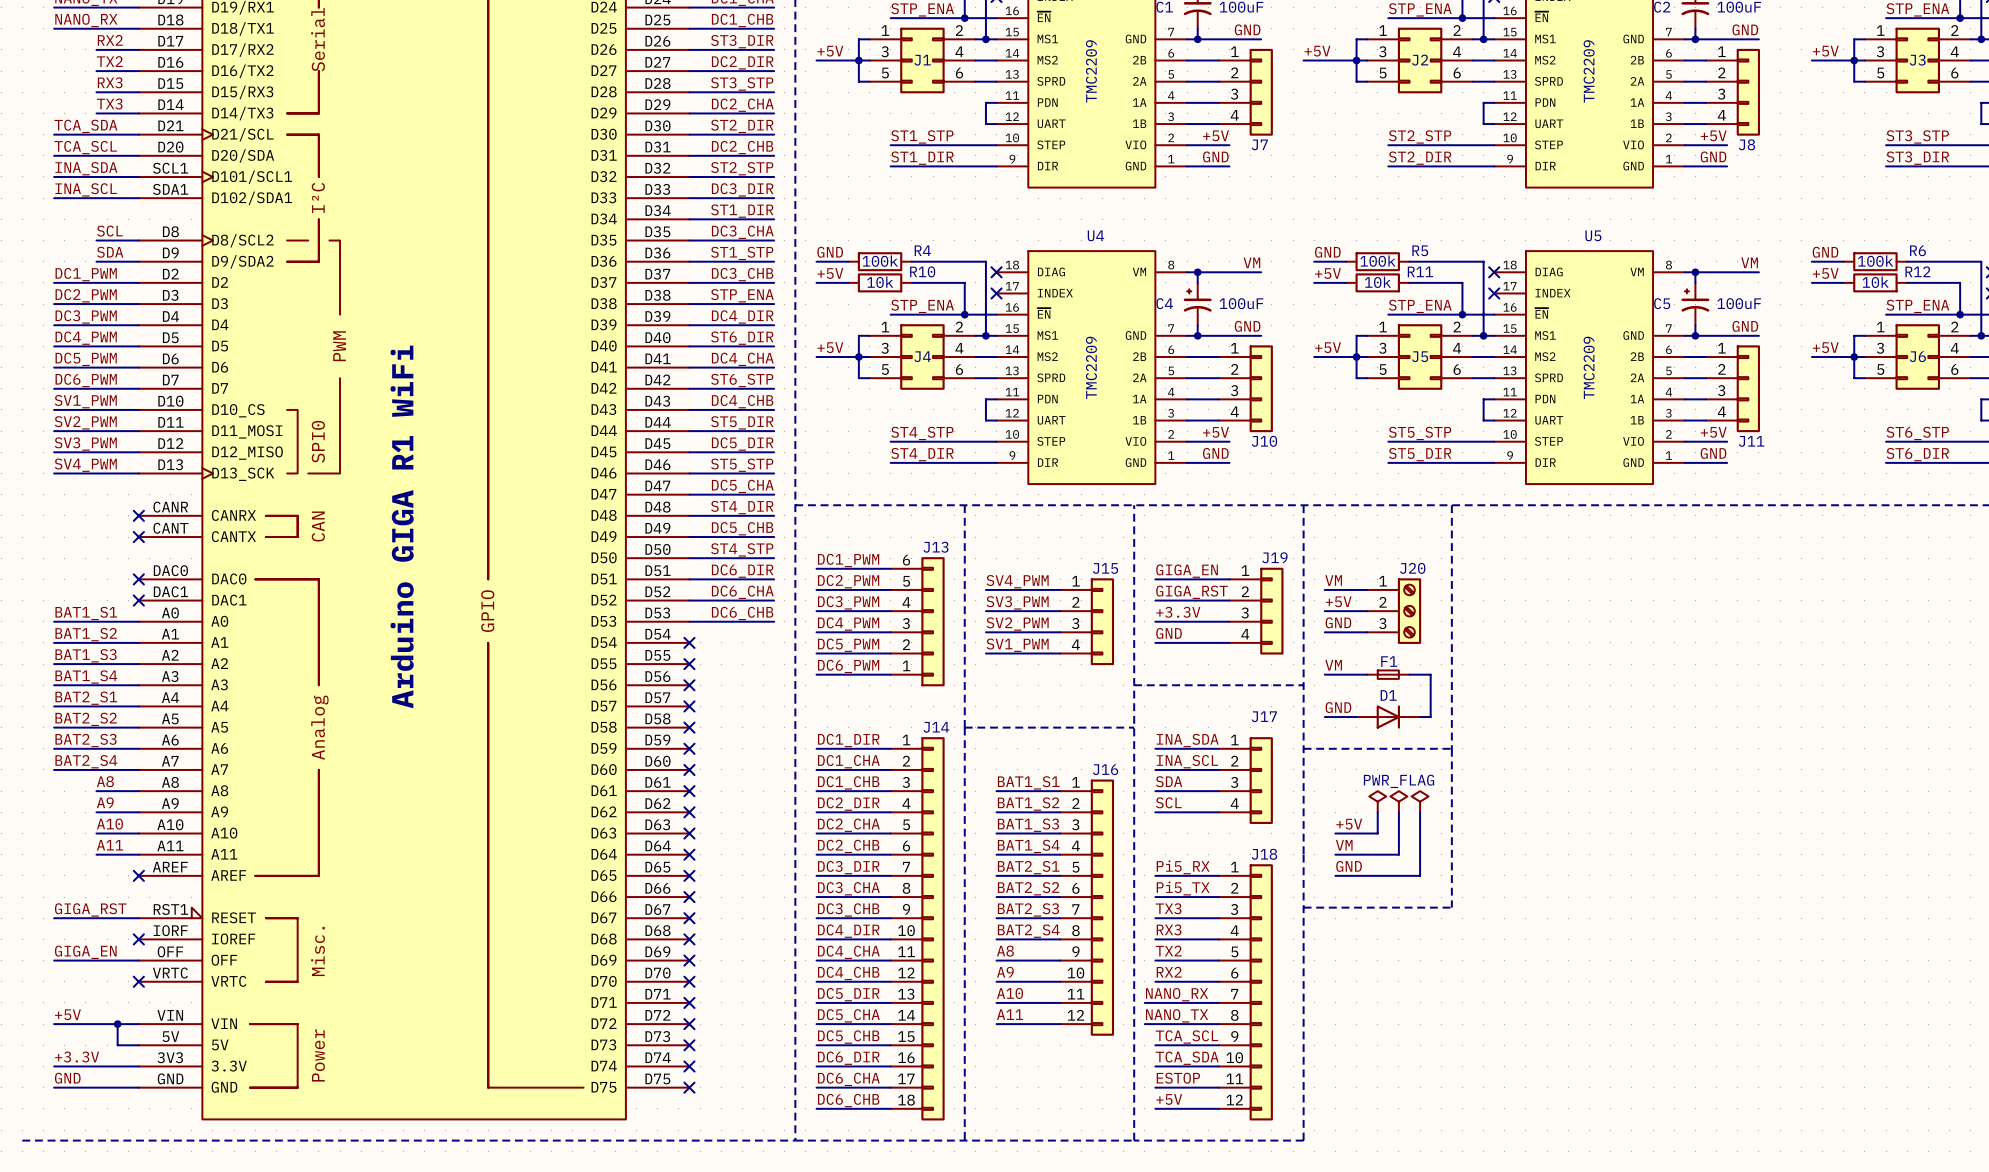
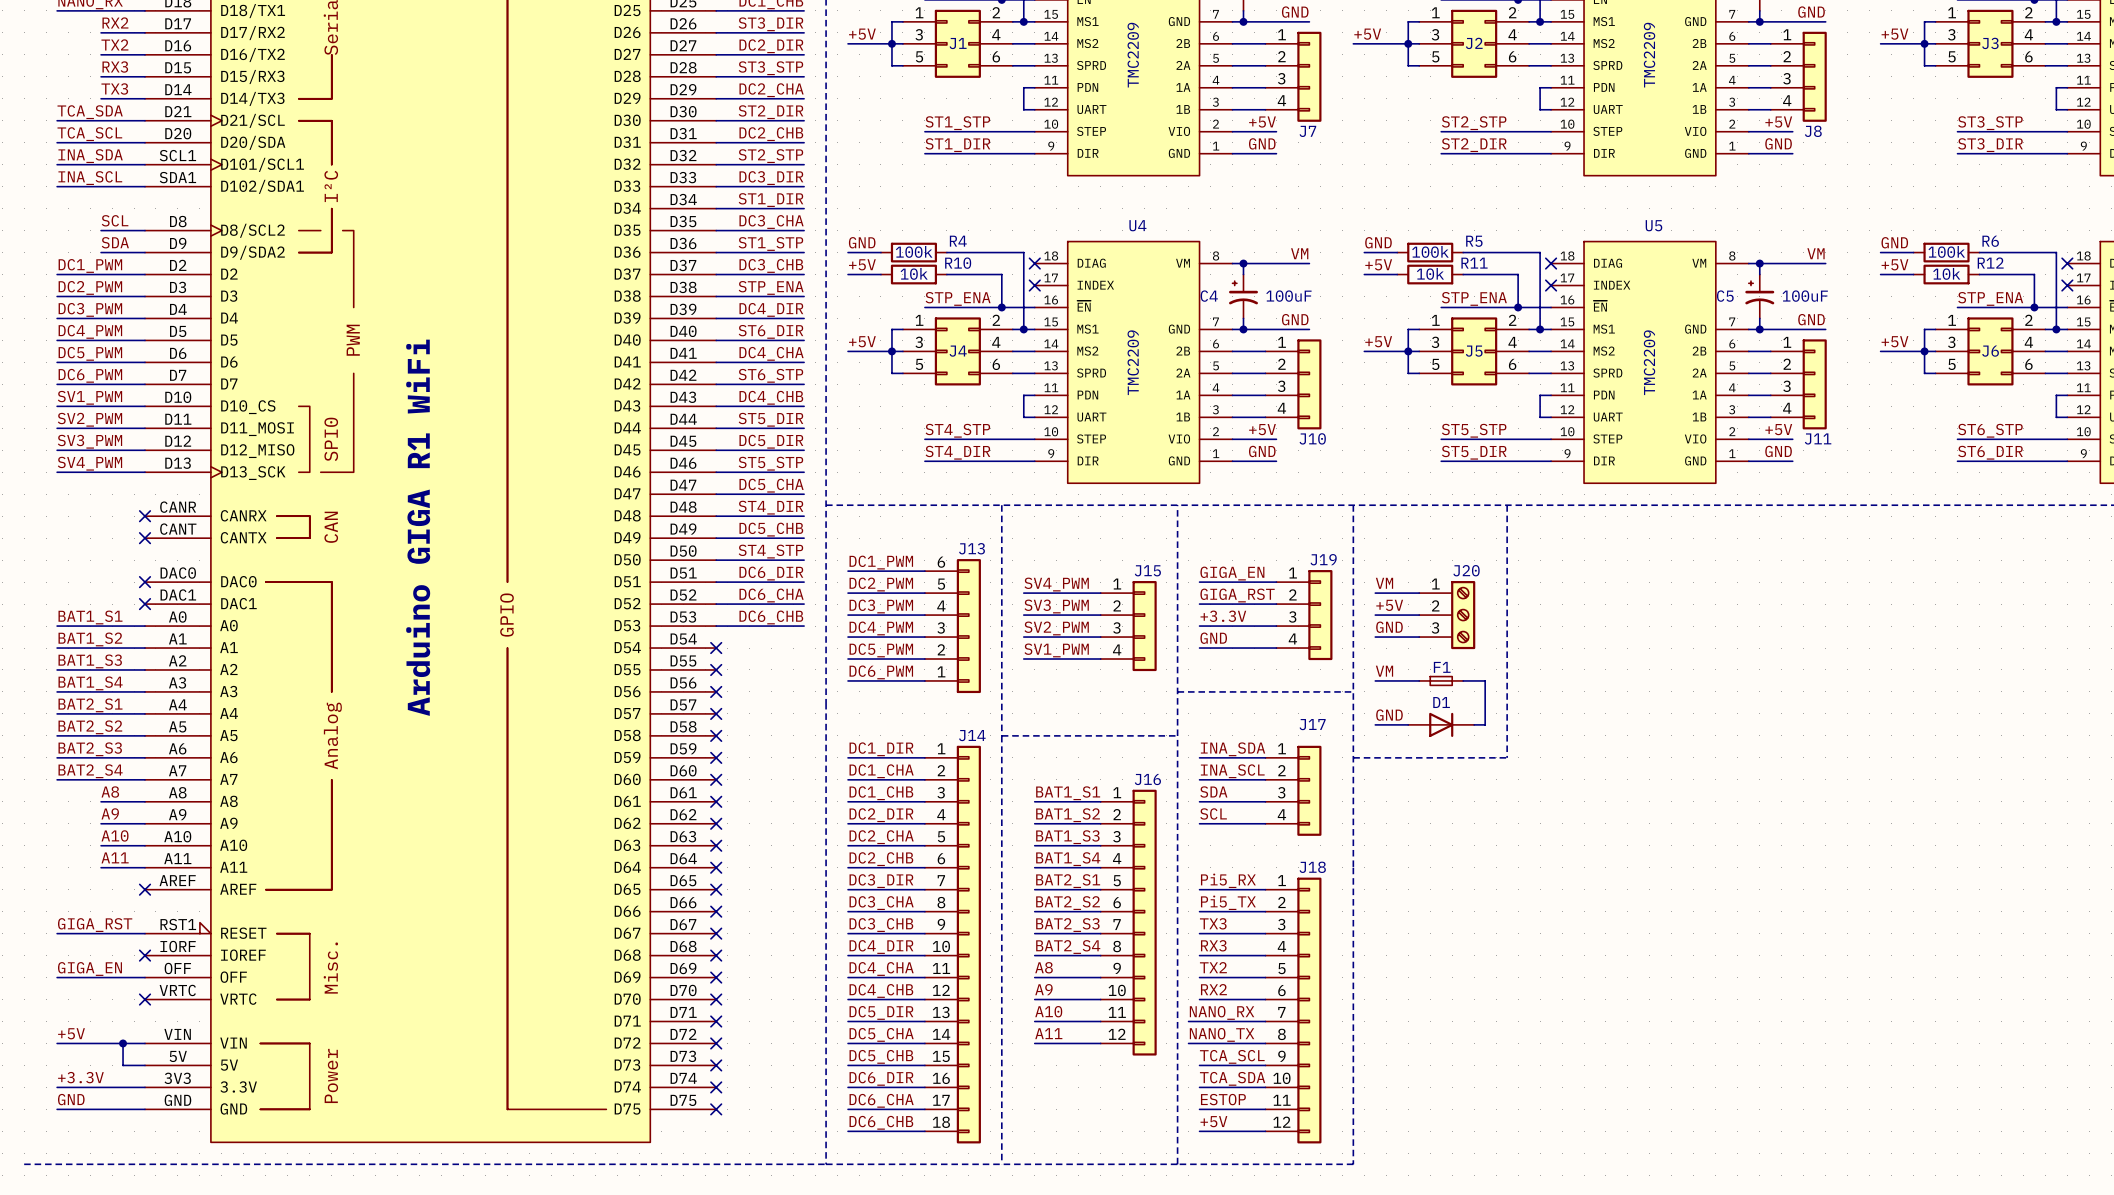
line: (1451, 748) (1451, 907) (1303, 907) -> none
power symbol: (1377, 801) -> none
power symbol: PWR_FLAG (1398, 801) -> none
power symbol: (1420, 801) -> none
wire: (1377, 812) (1377, 833) (1335, 833) -> none
wire: (1398, 812) (1398, 854) (1335, 854) -> none
wire: (1420, 812) (1420, 875) (1335, 875) -> none
label: +5V (1349, 824) -> none
label: VM (1344, 845) -> none
label: GND (1349, 866) -> none

